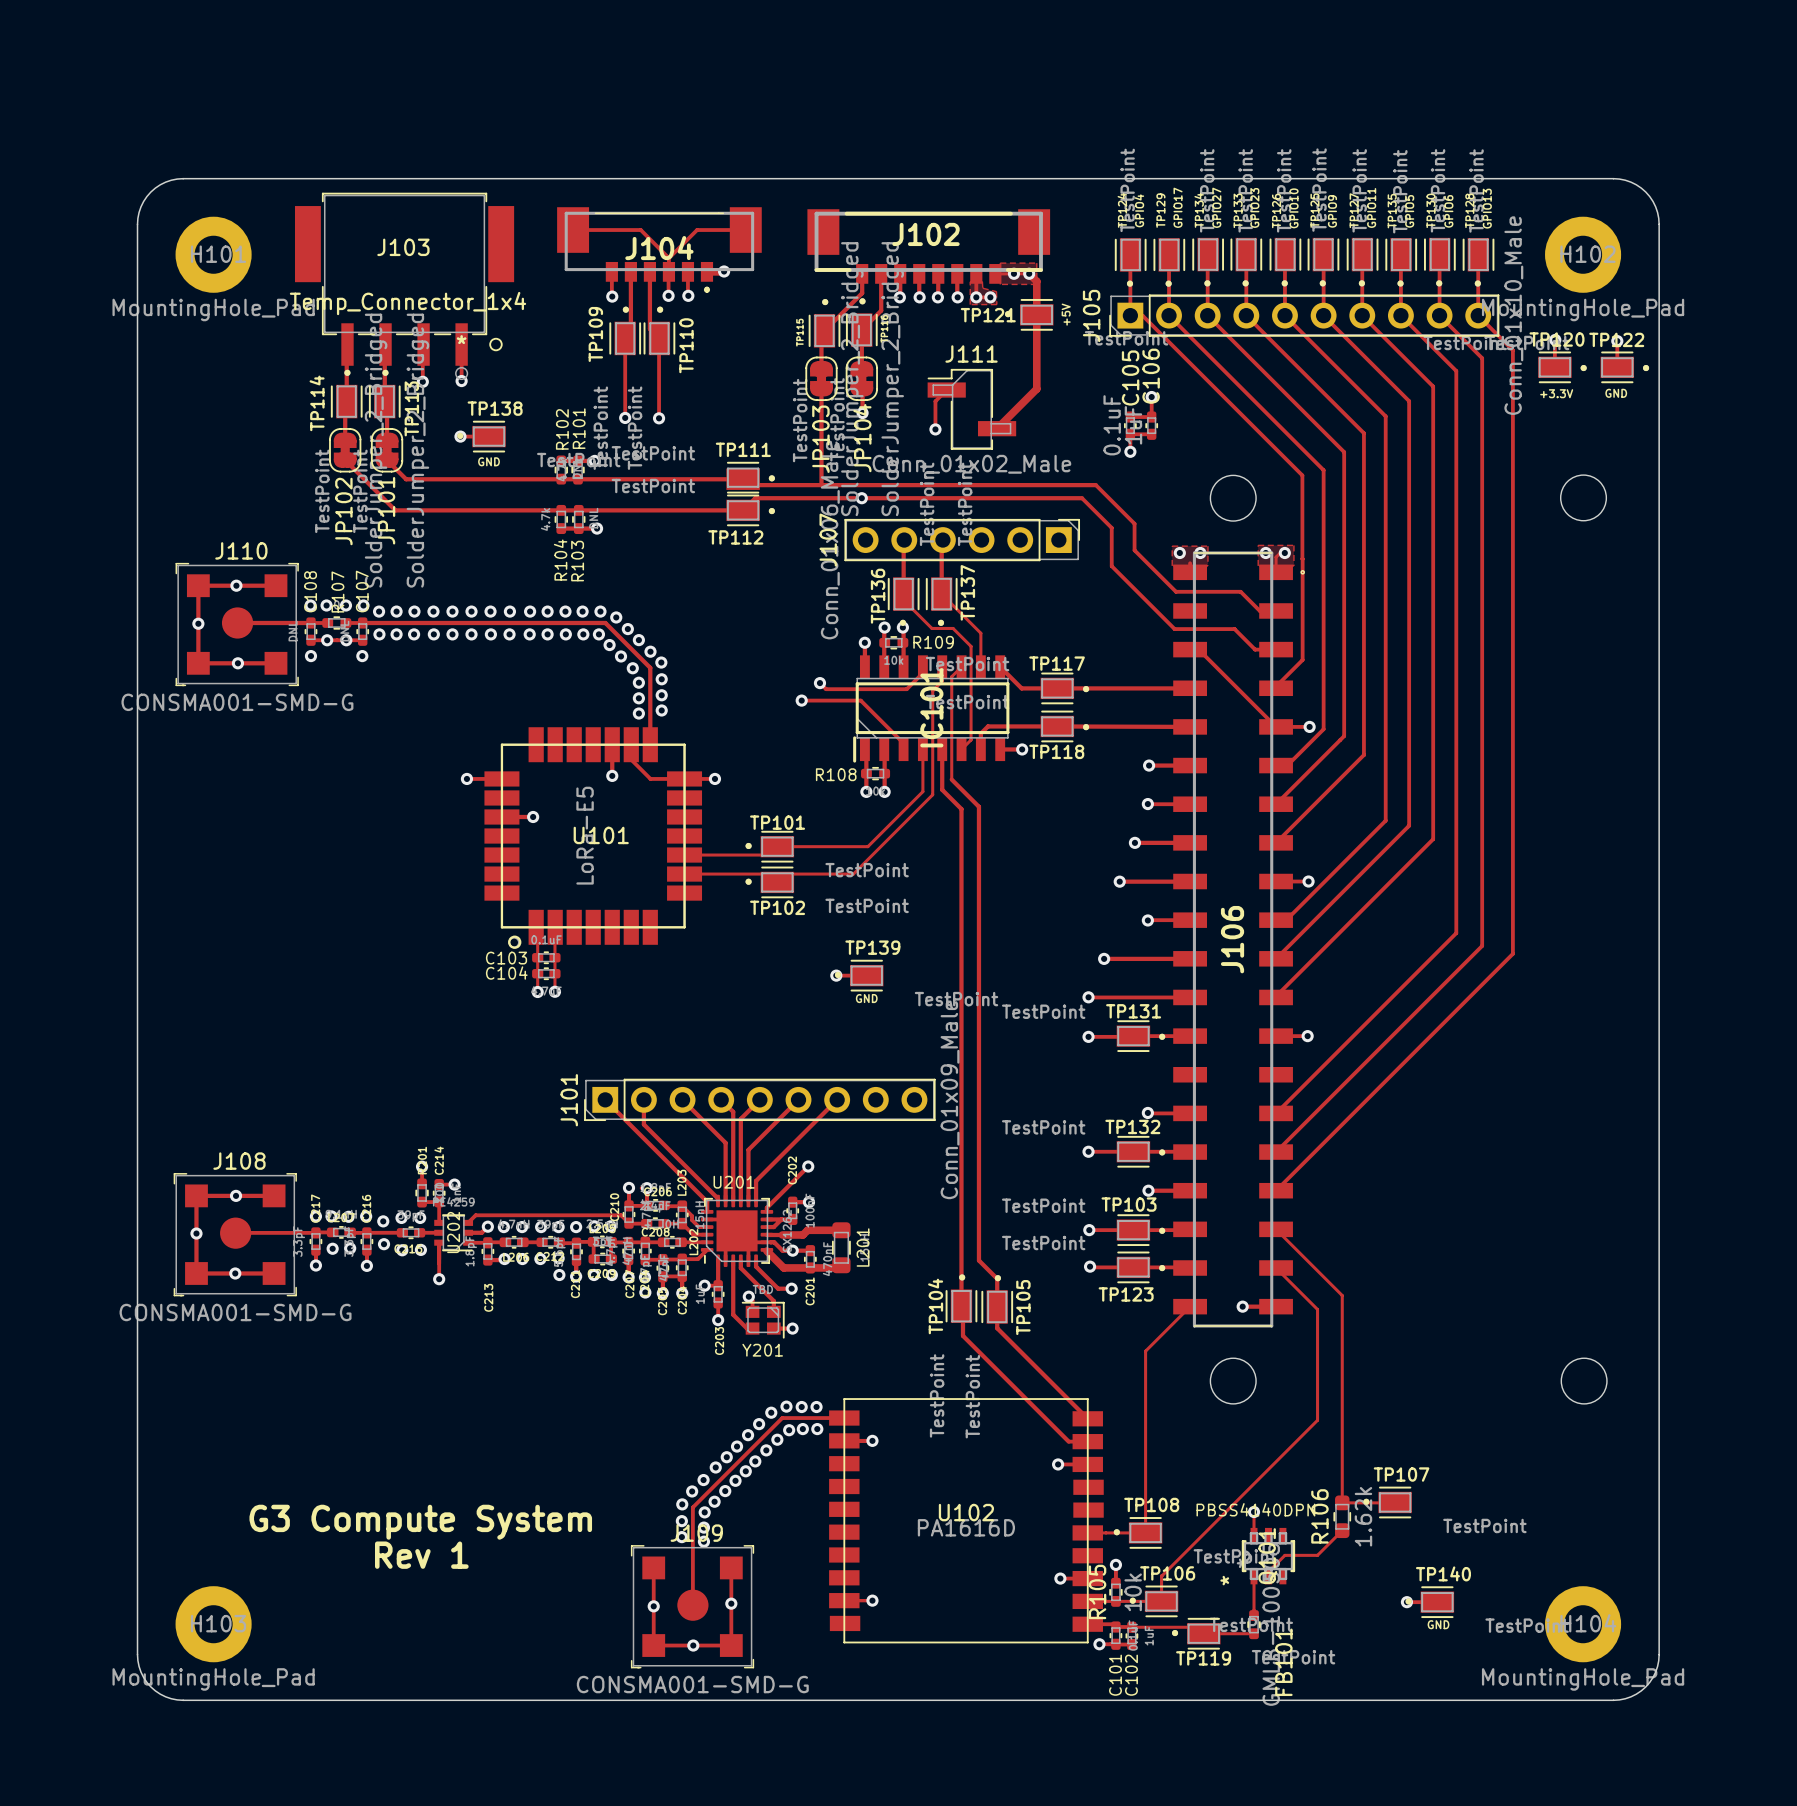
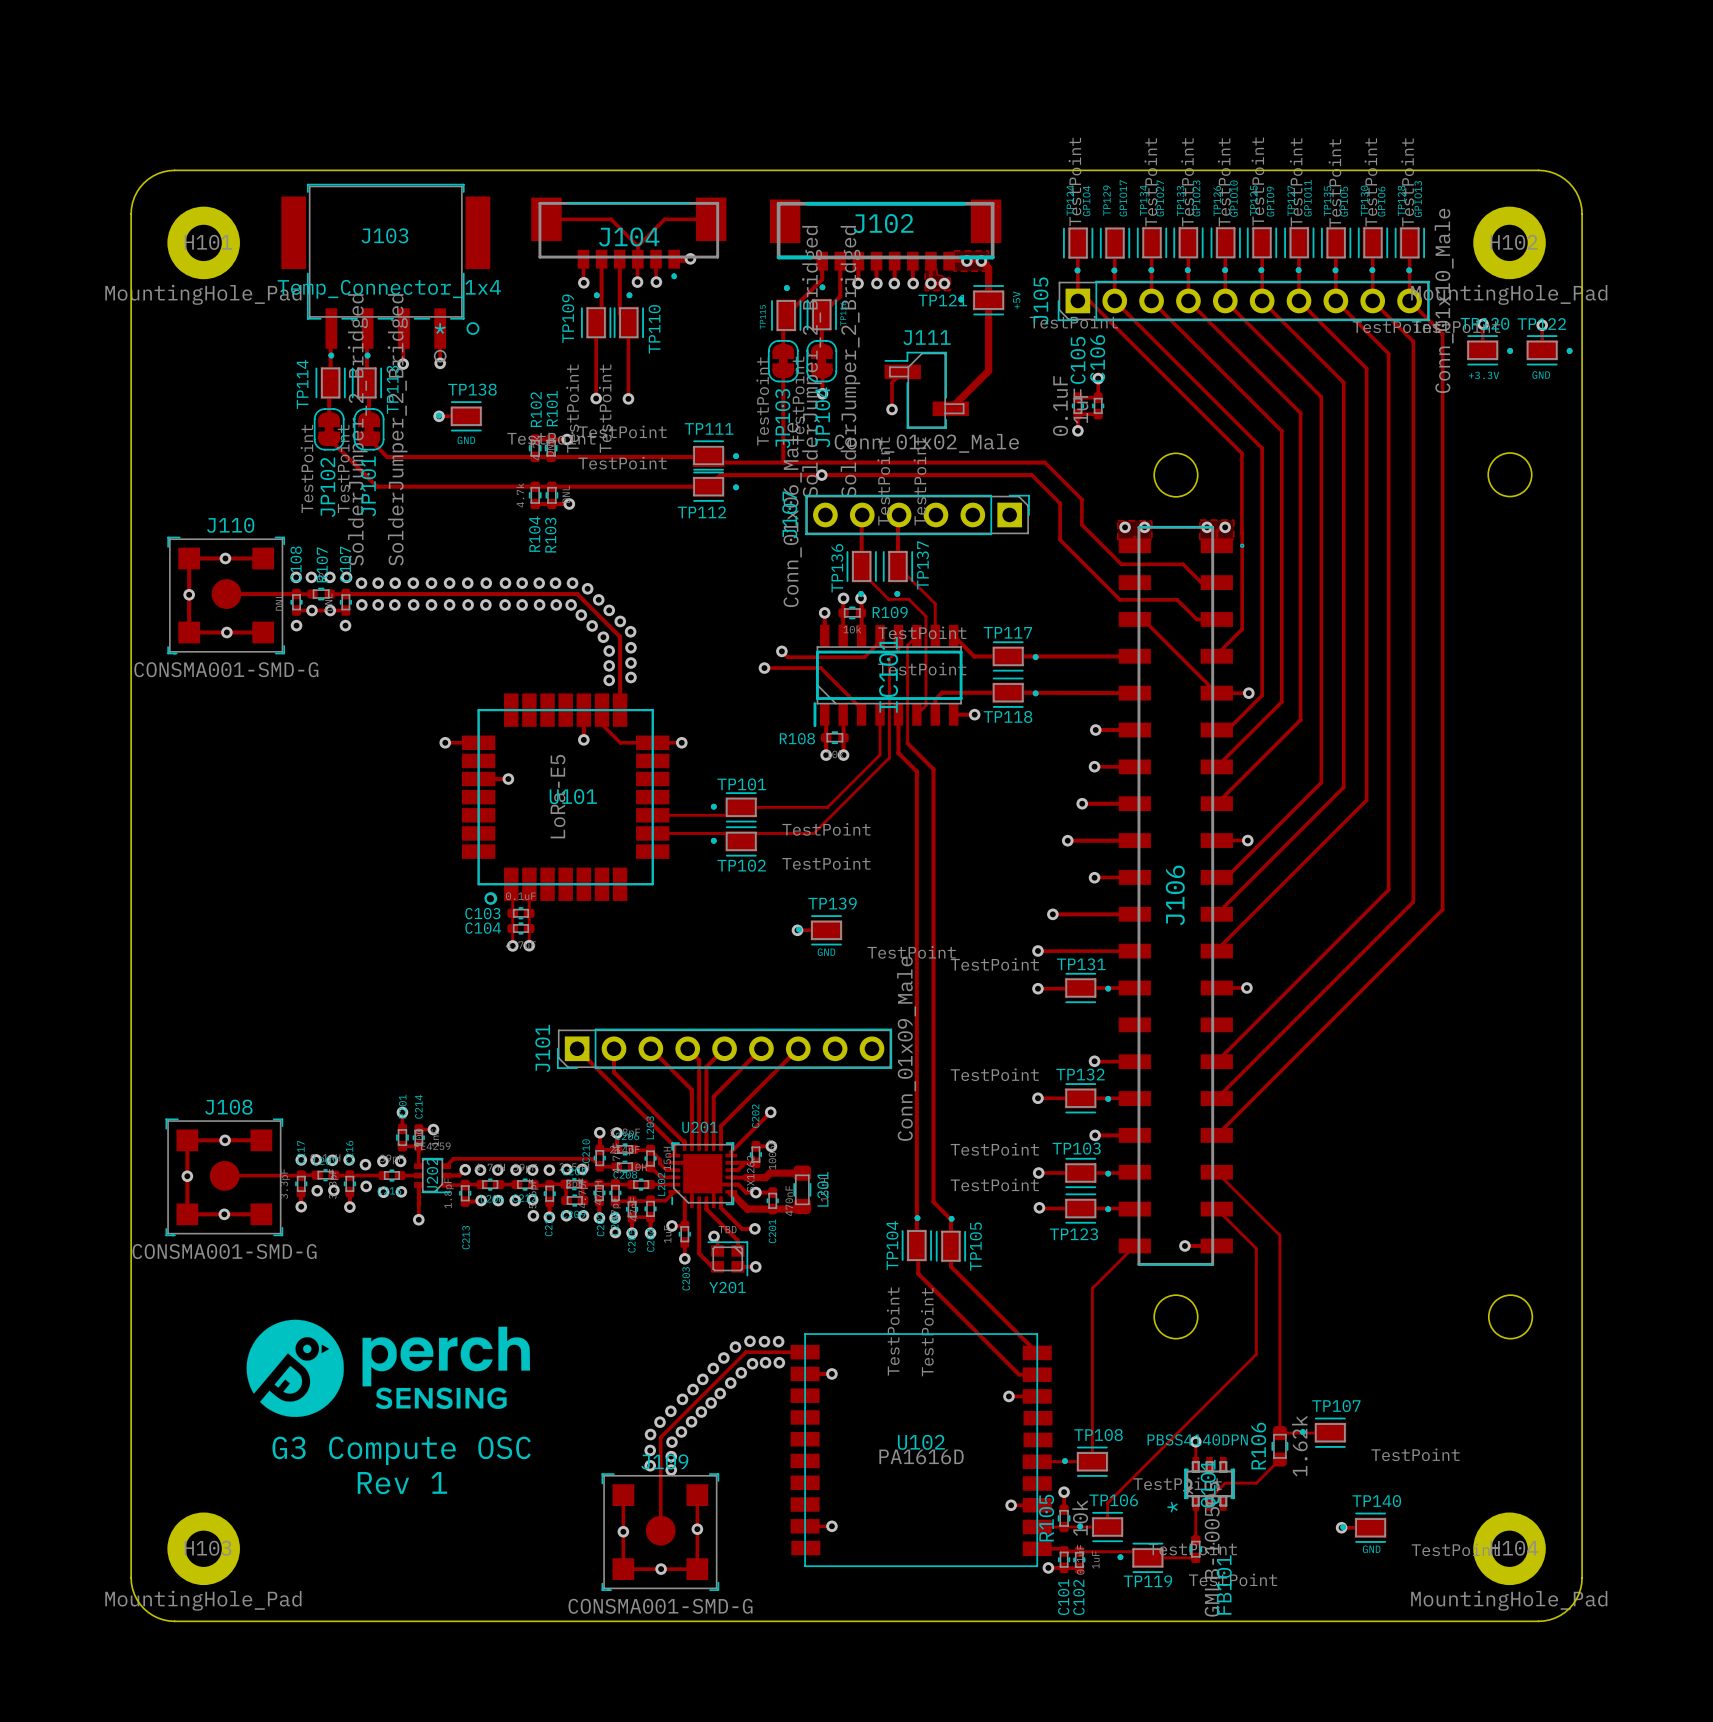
drawing: none -> [246, 1319, 531, 1417]
text: G3 Compute System (420, 1522) -> G3 Compute OSC (401, 1450)

